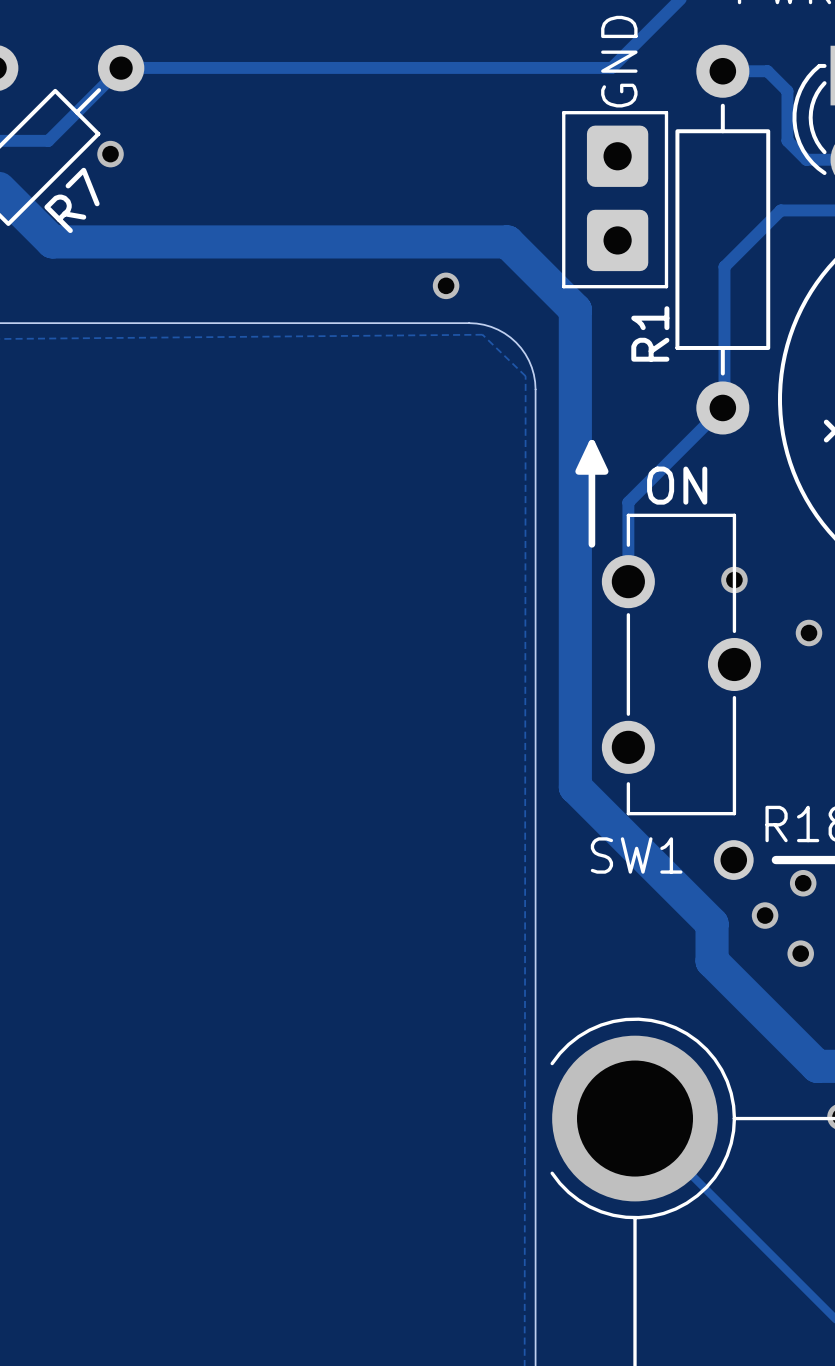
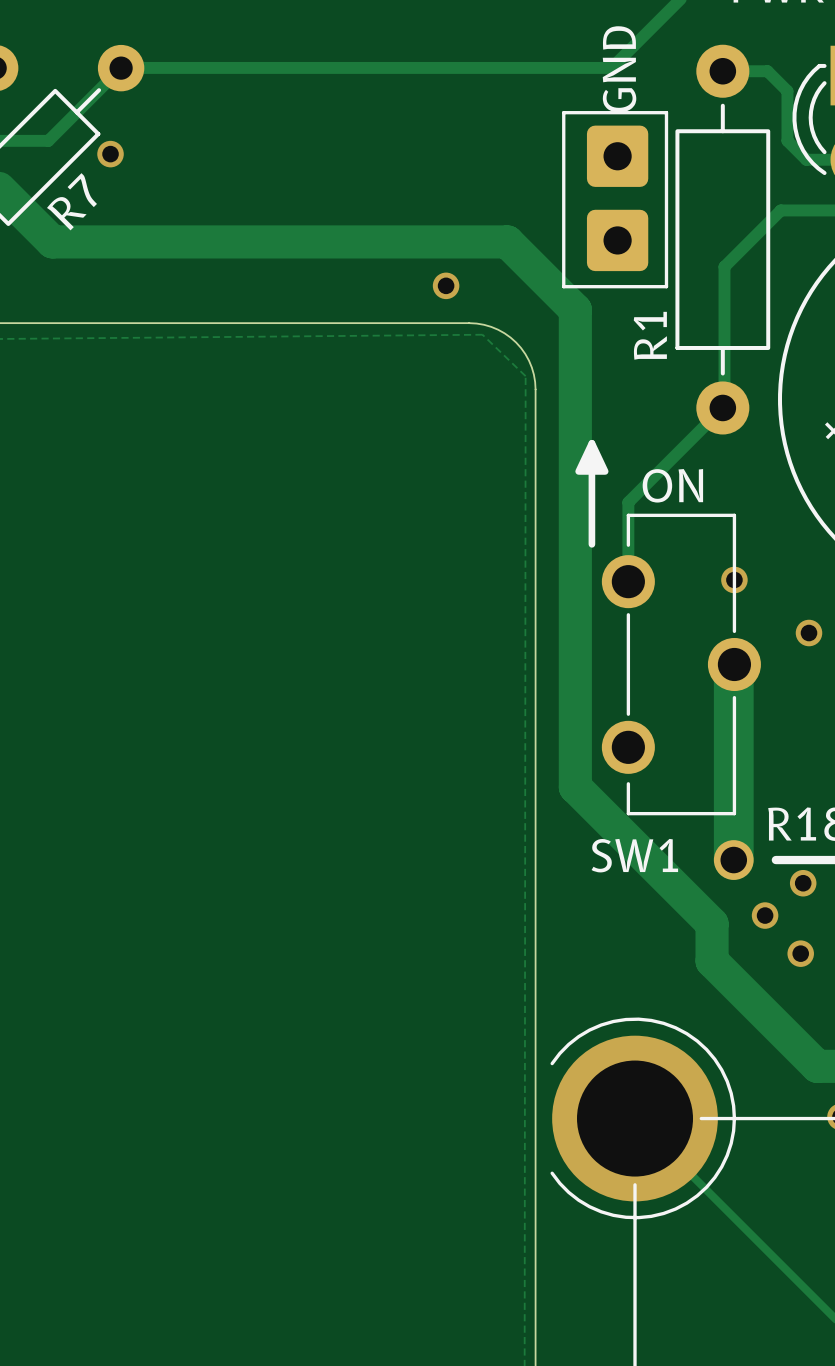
track: none -> (734, 664) (733, 860)
line: none -> (701, 1118) (734, 1118)
line: none -> (635, 1184) (635, 1217)

